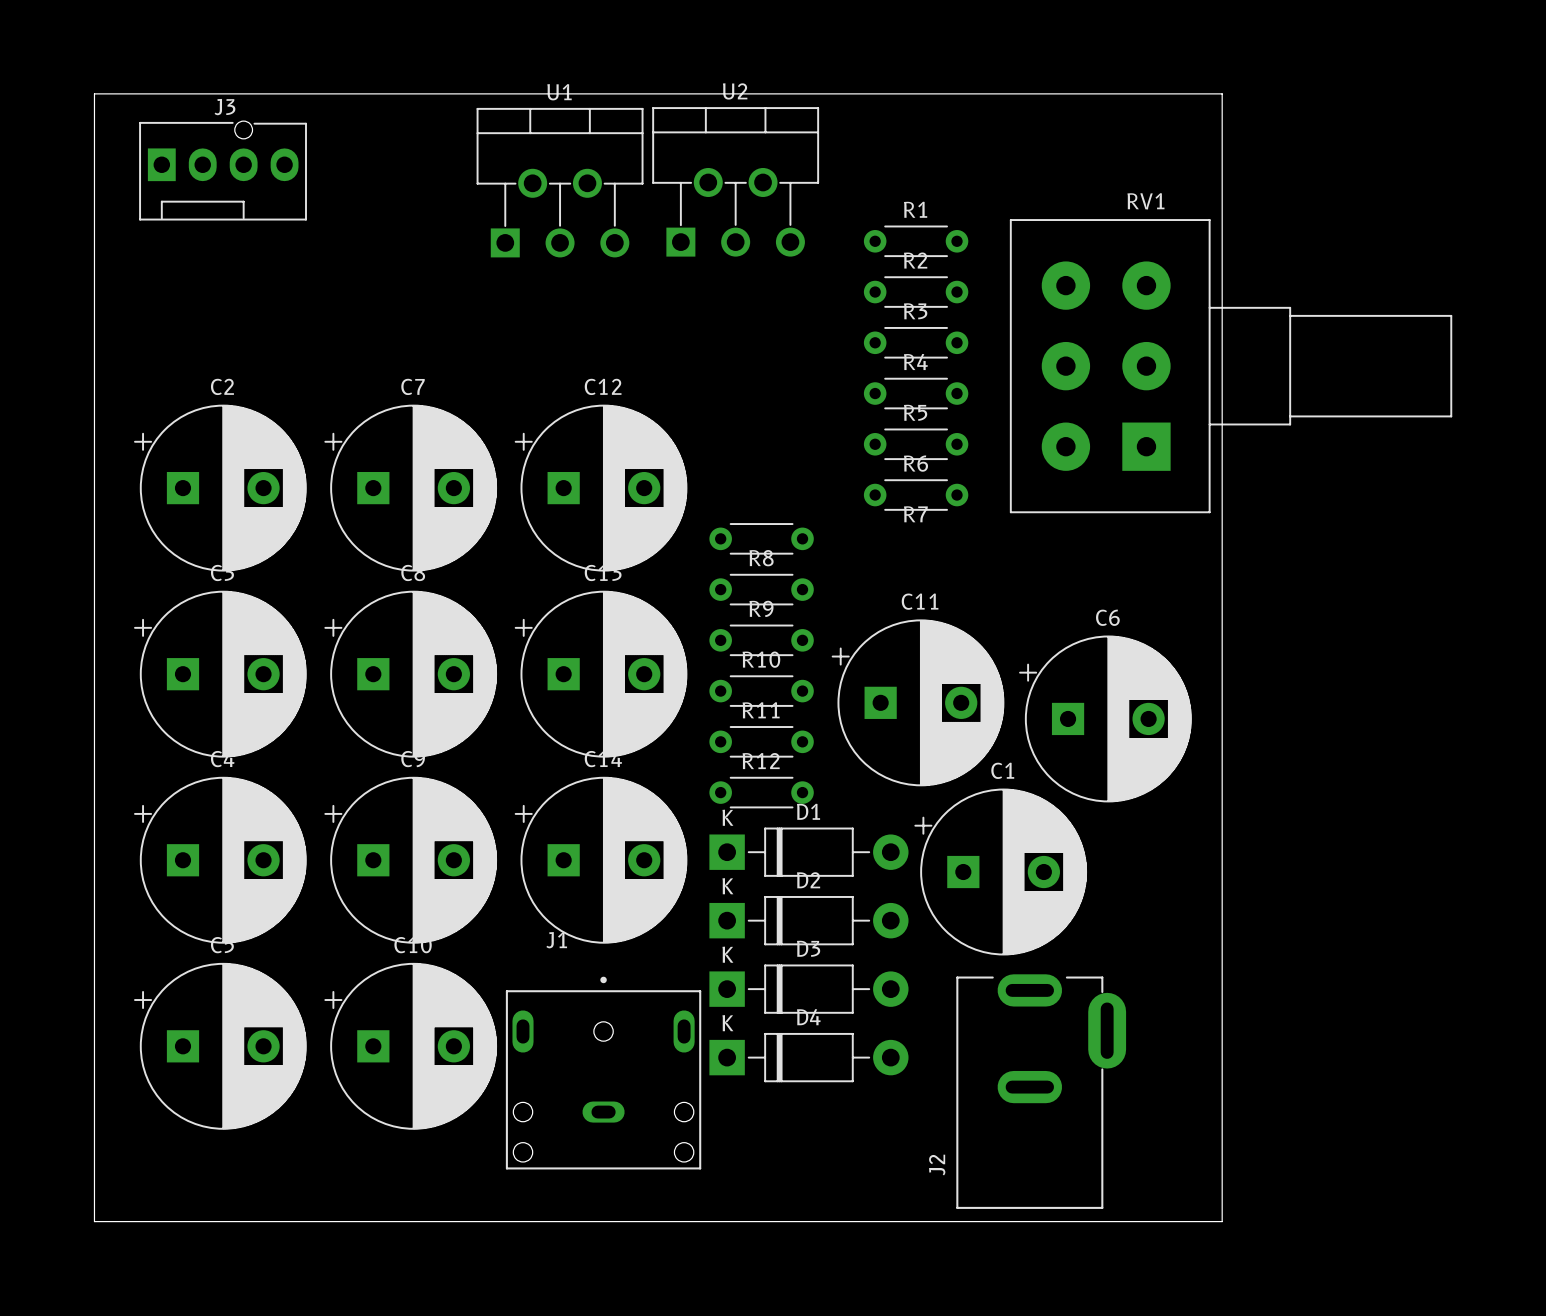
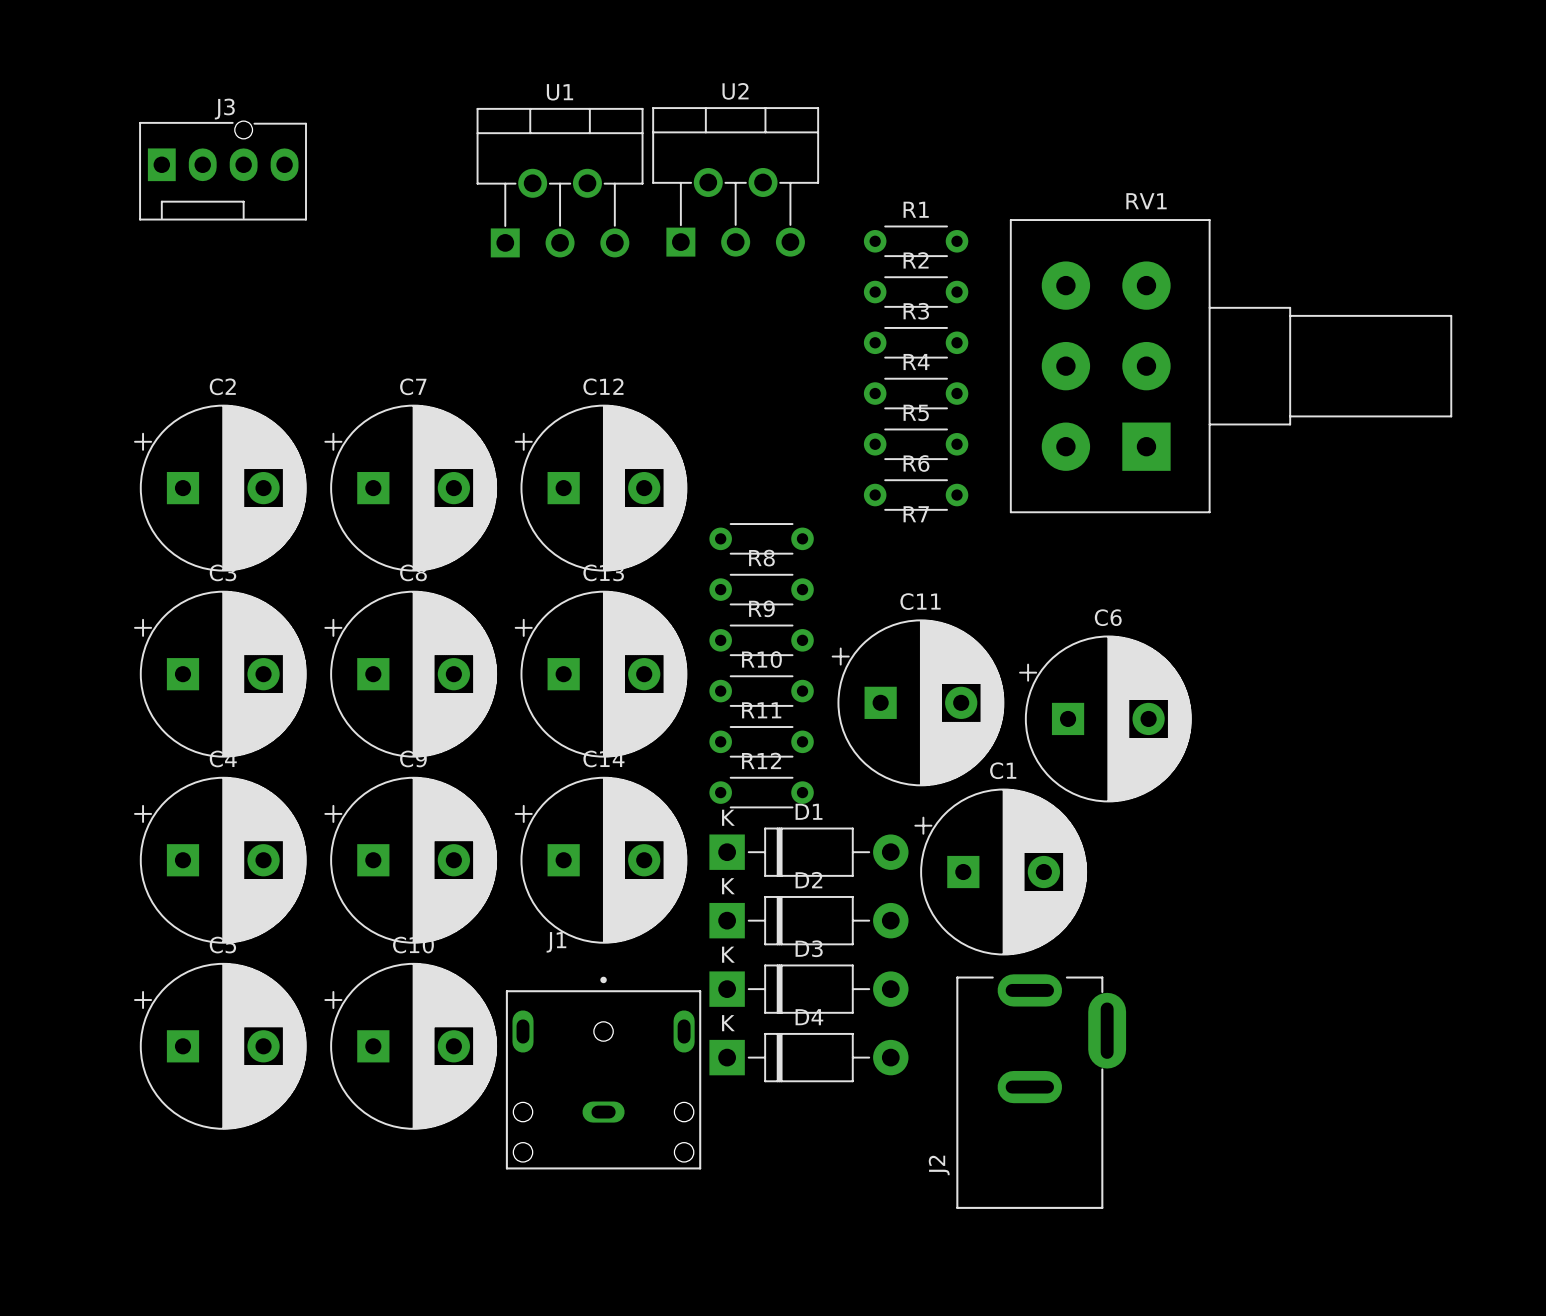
board edge: (94, 93) (1222, 93) (1222, 1221) (94, 1221) (94, 93) -> none

